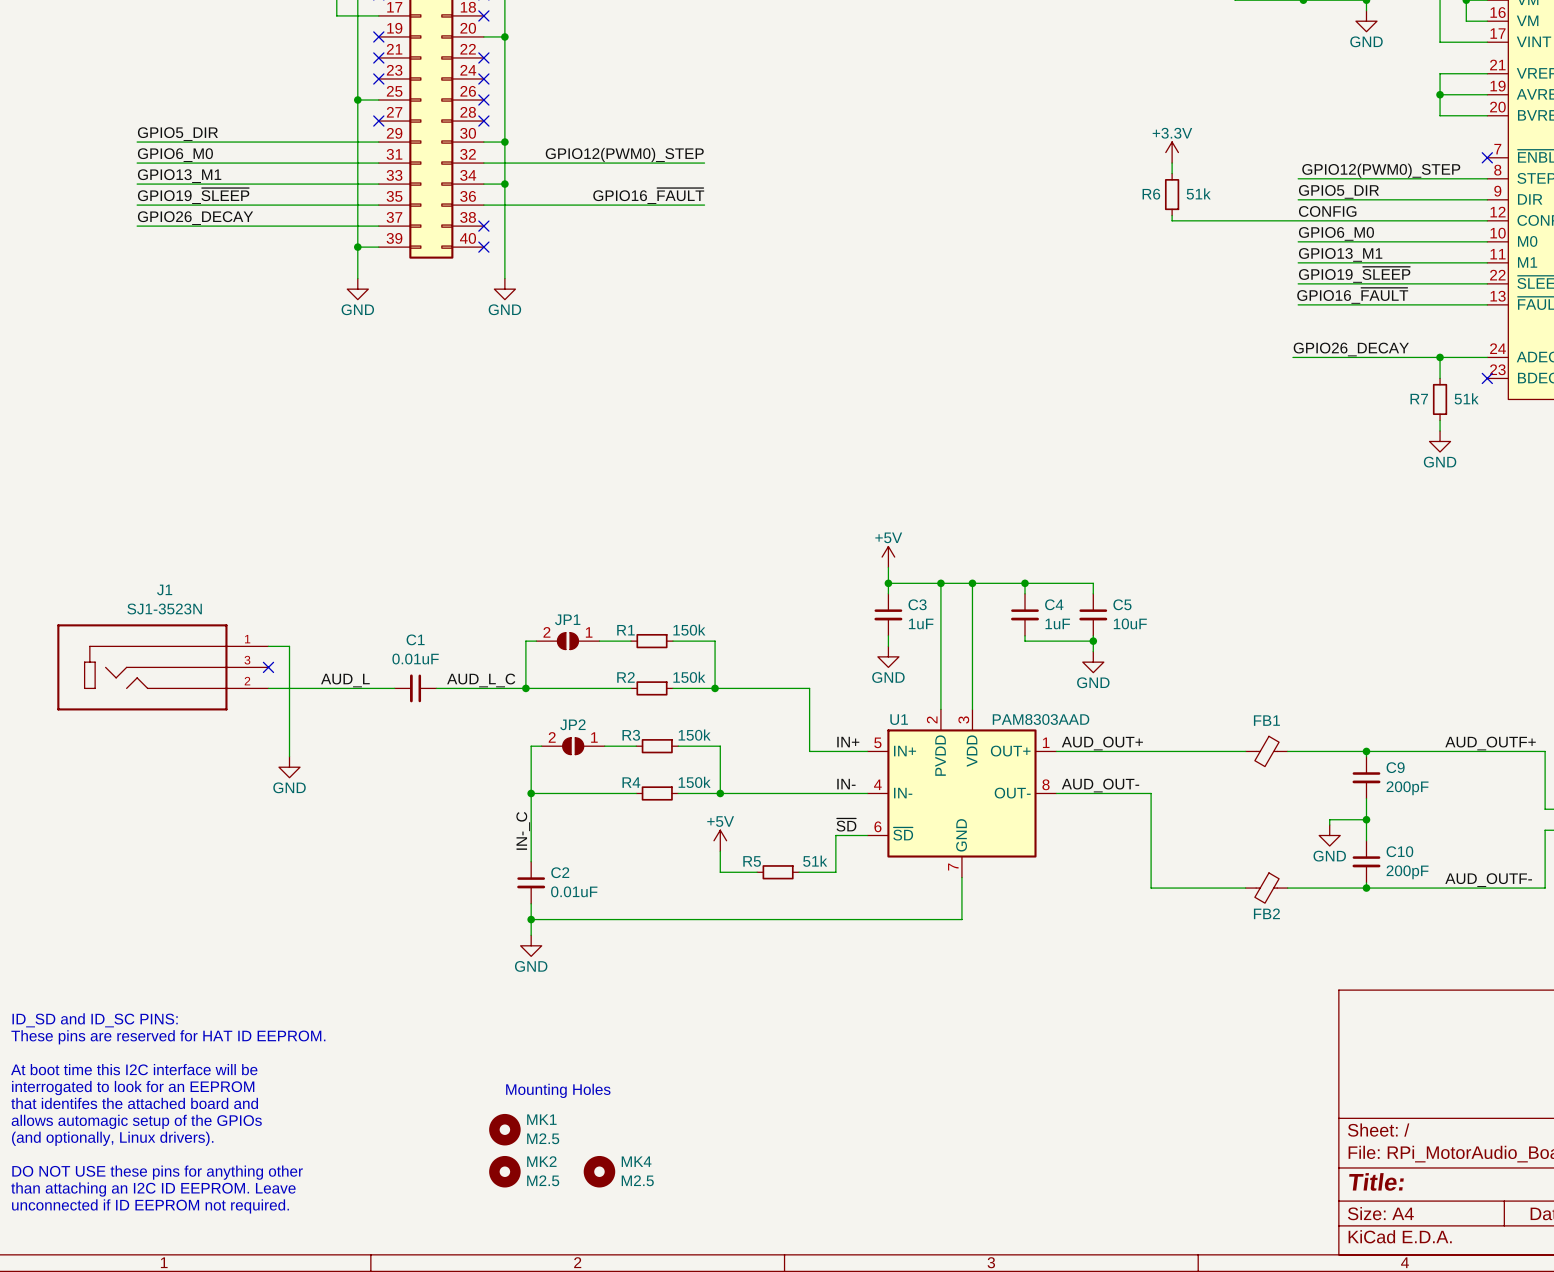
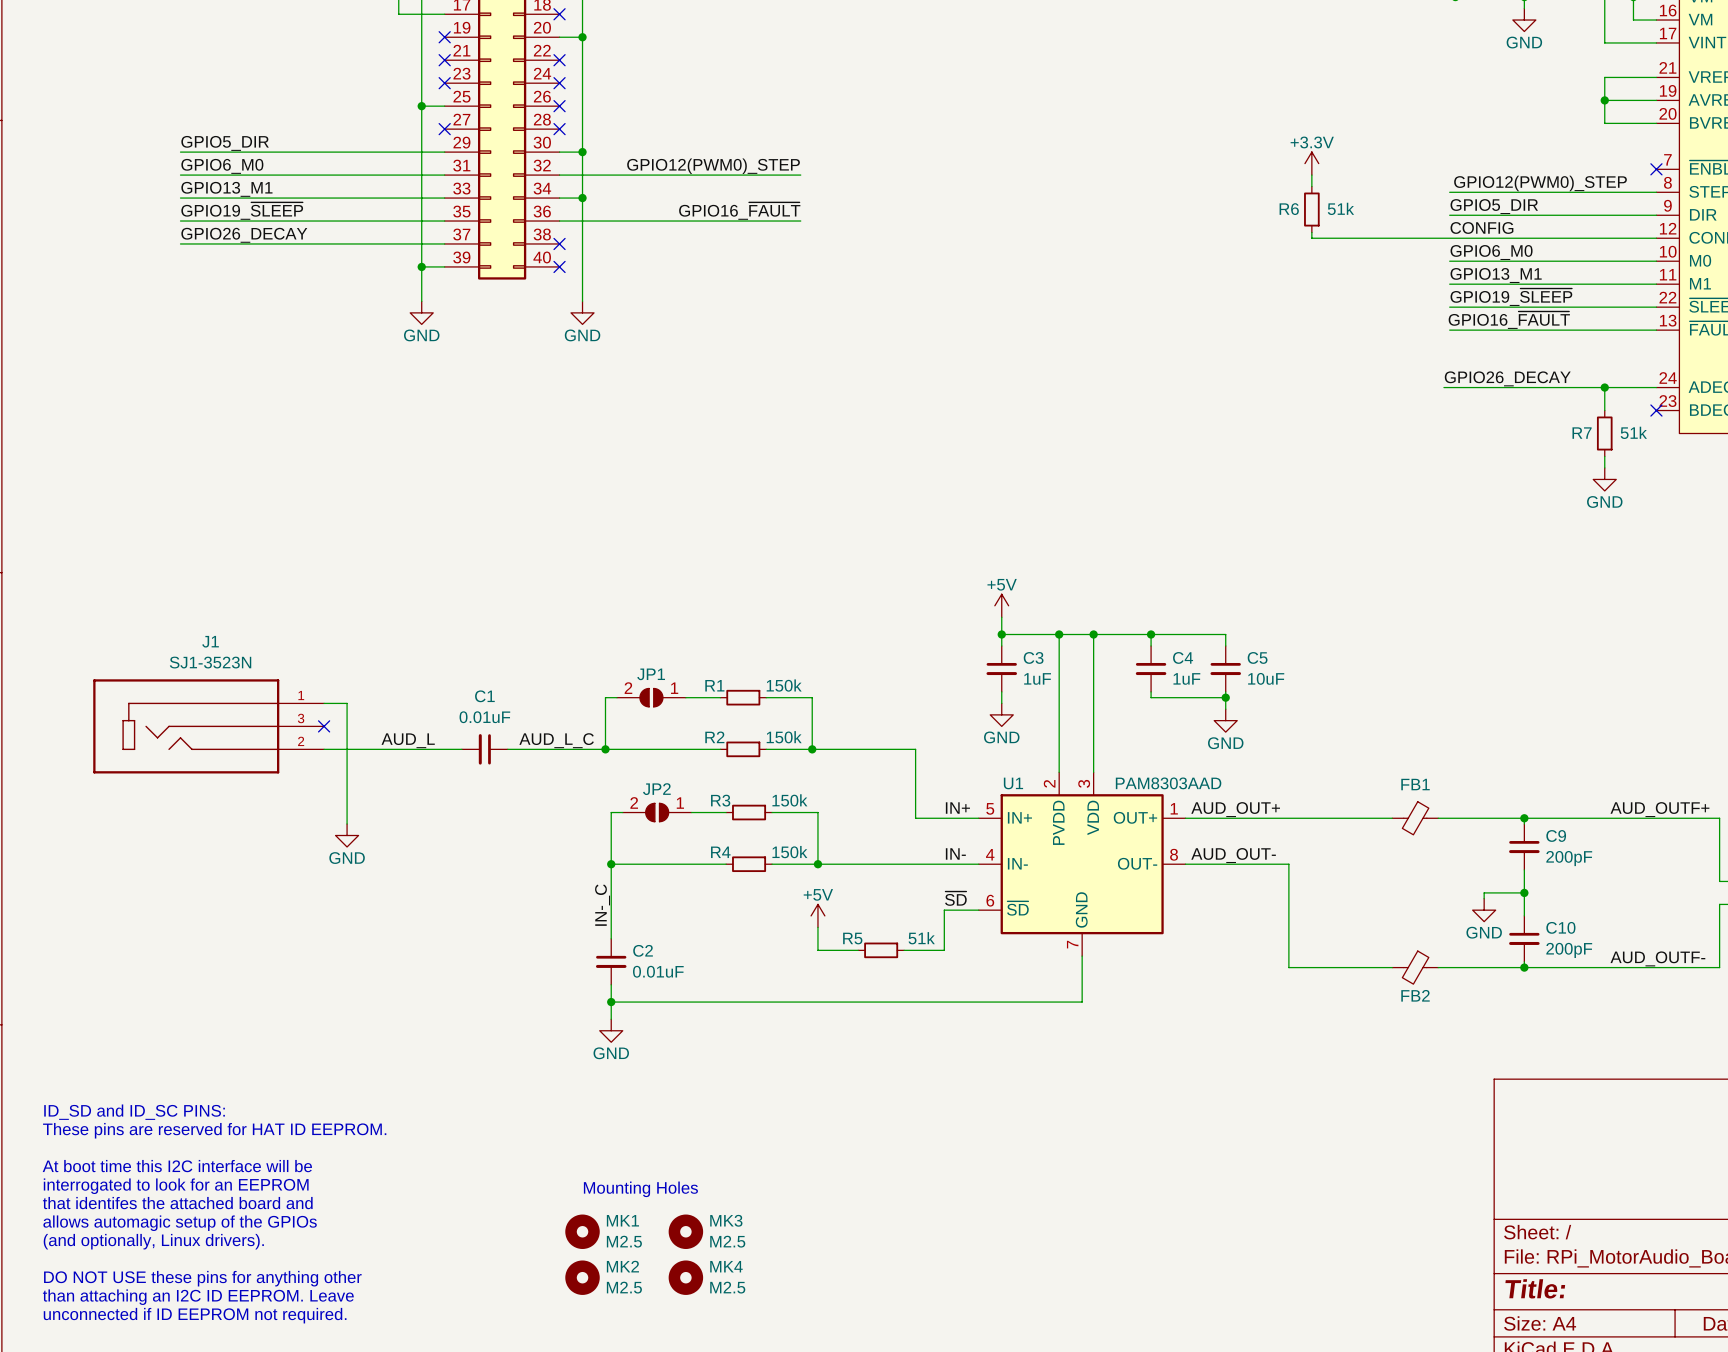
MK3: none -> M2.5 (685, 1231)

